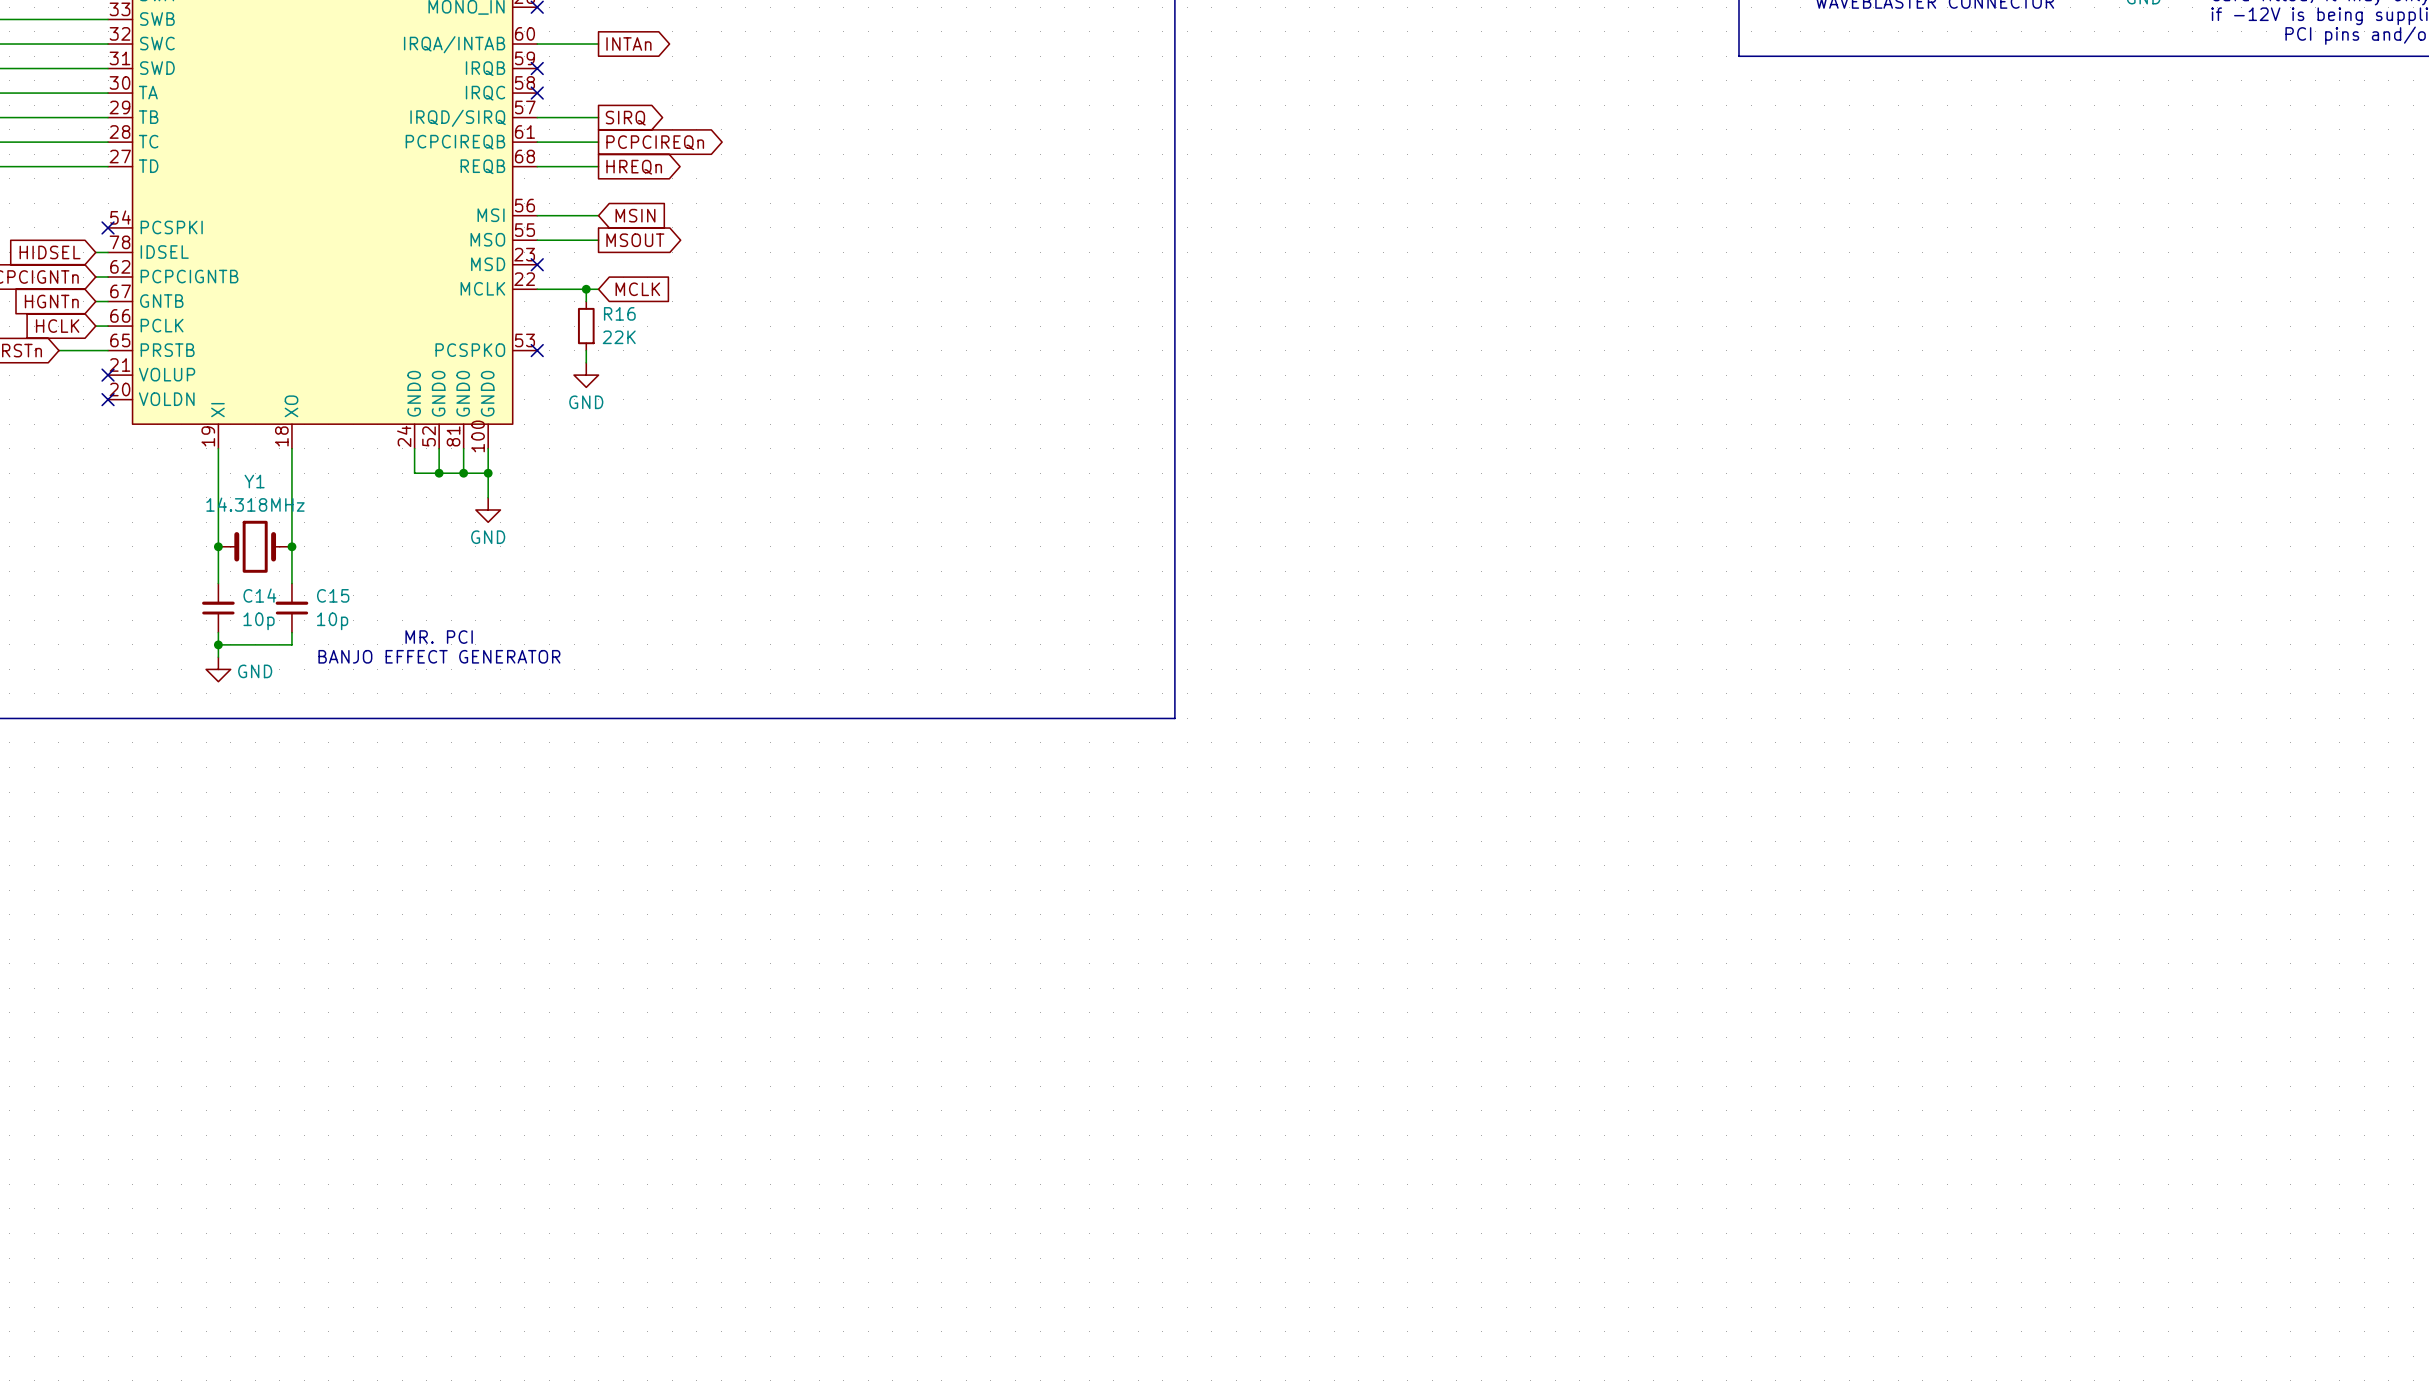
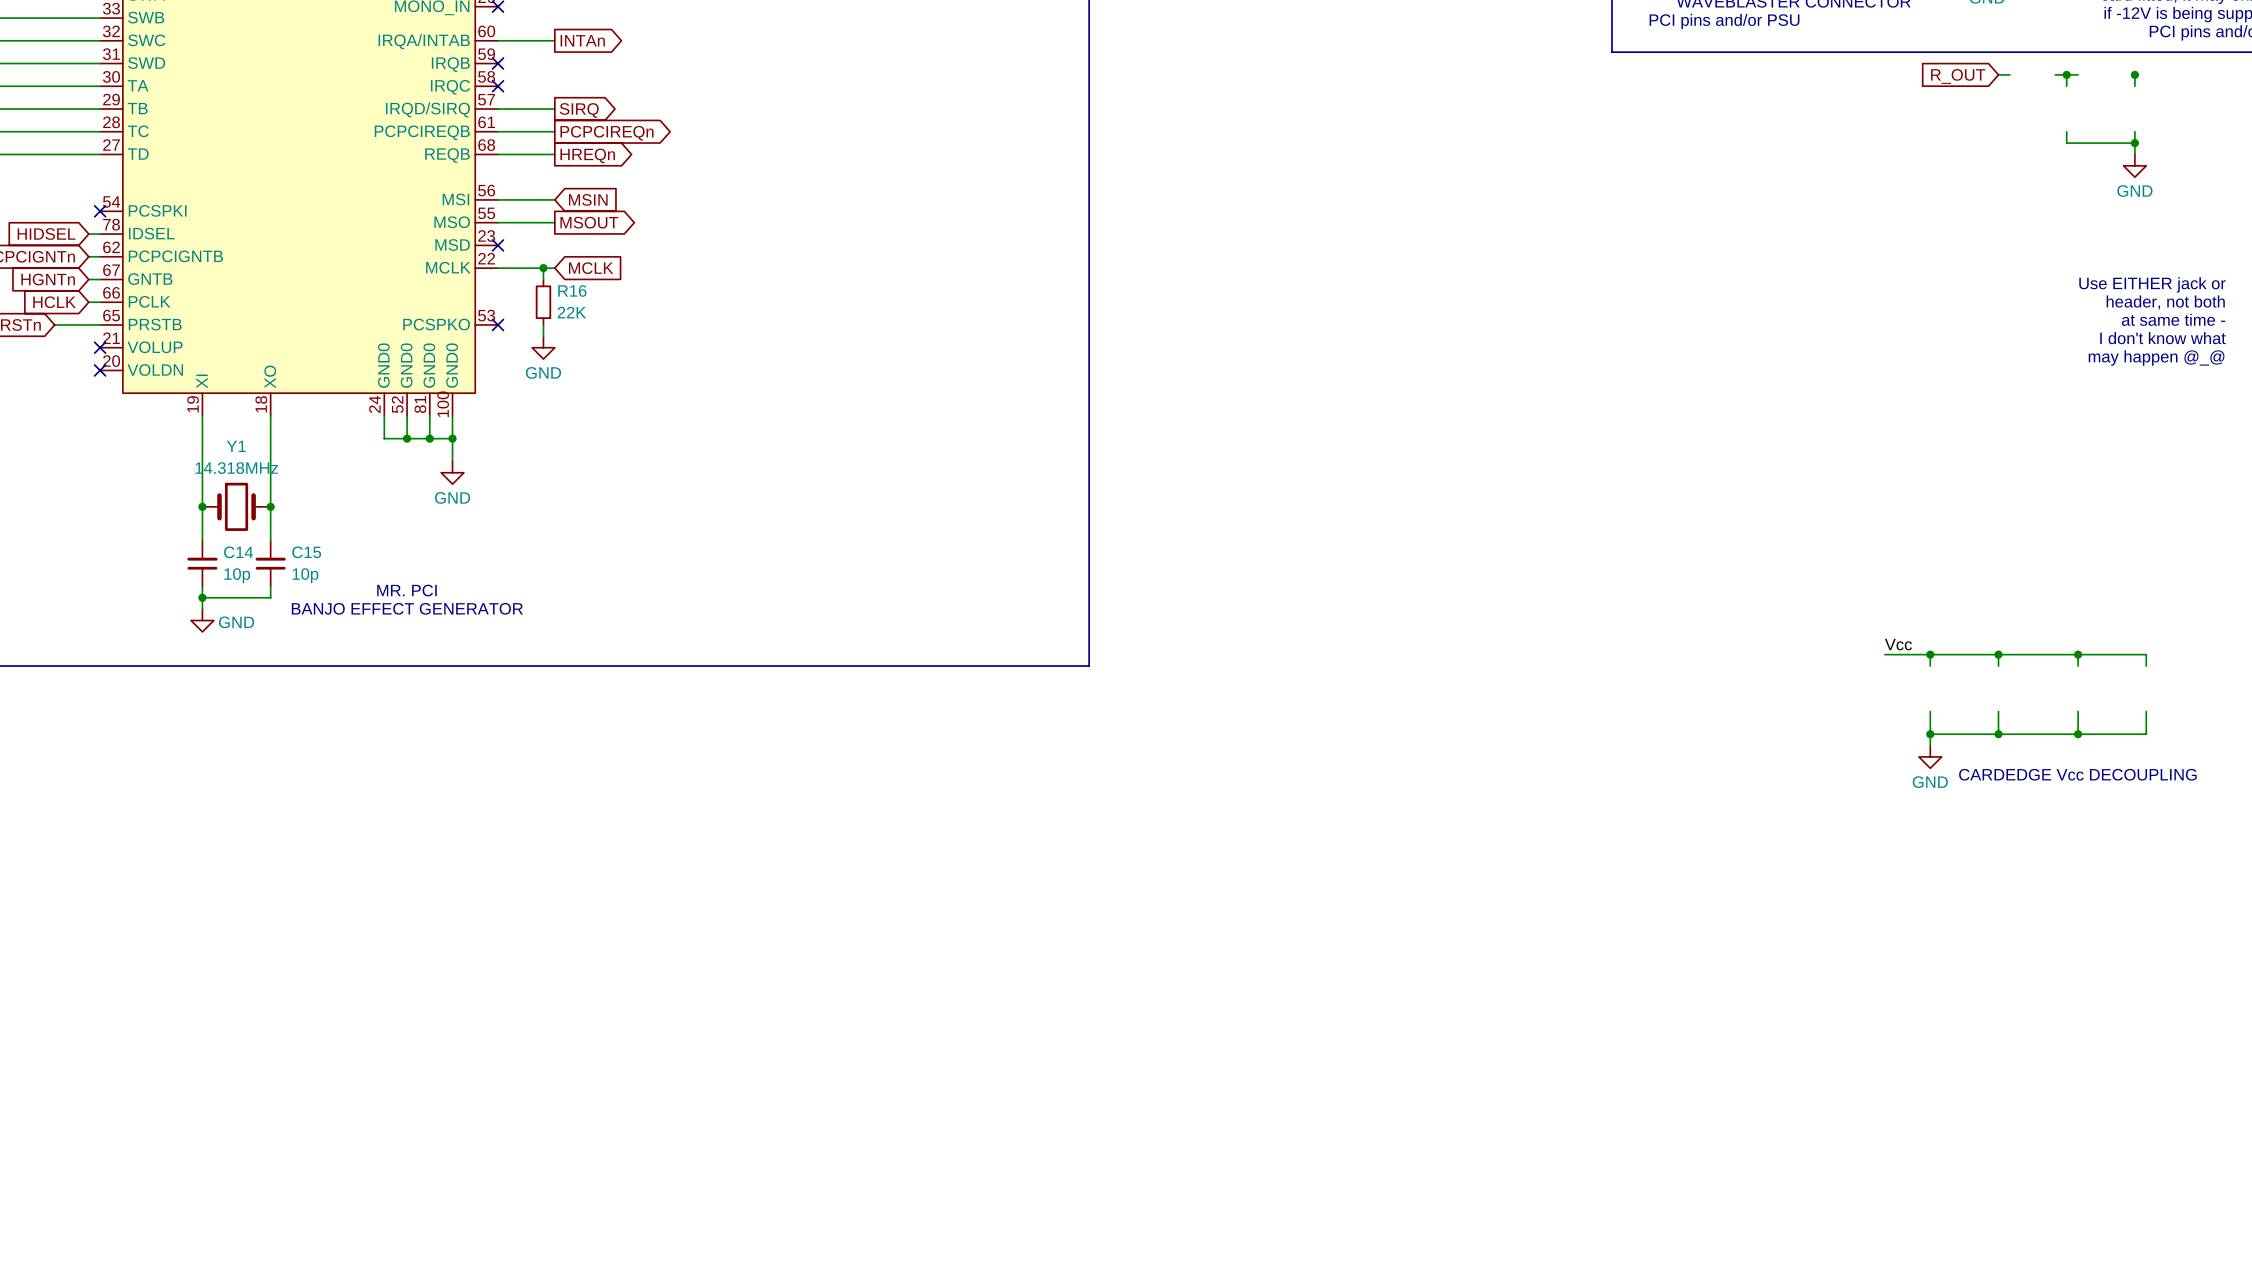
text: none -> PCI pins and/or PSU (1724, 21)
wire: none -> (1998, 74) (2009, 74)
wire: none -> (2055, 74) (2078, 74)
wire: none -> (2066, 74) (2066, 86)
junction: none -> (2066, 74)
wire: none -> (2134, 74) (2134, 86)
junction: none -> (2134, 74)
global label: none -> R_OUT (1958, 76)
wire: none -> (2066, 131) (2066, 143) (2134, 143)
wire: none -> (2134, 131) (2134, 154)
junction: none -> (2134, 143)
power symbol: none -> GND (2134, 165)
text: none -> Use EITHER jack or (2152, 284)
text: none -> header, not both (2165, 302)
text: none -> at same time - (2173, 319)
text: none -> I don't know what (2162, 338)
text: none -> may happen @_@ (2156, 358)
label: none -> Vcc (1898, 644)
wire: none -> (1884, 654) (2146, 654) (2146, 666)
wire: none -> (1930, 654) (1930, 666)
junction: none -> (1930, 654)
wire: none -> (1998, 654) (1998, 666)
junction: none -> (1998, 654)
wire: none -> (2078, 654) (2078, 666)
junction: none -> (2078, 654)
wire: none -> (1930, 711) (1930, 745)
wire: none -> (1998, 711) (1998, 734)
wire: none -> (2078, 711) (2078, 734)
wire: none -> (2146, 711) (2146, 734) (1930, 734)
junction: none -> (1930, 734)
junction: none -> (1998, 734)
junction: none -> (2078, 734)
power symbol: none -> GND (1930, 756)
text: none -> CARDEDGE Vcc DECOUPLING (2077, 774)

